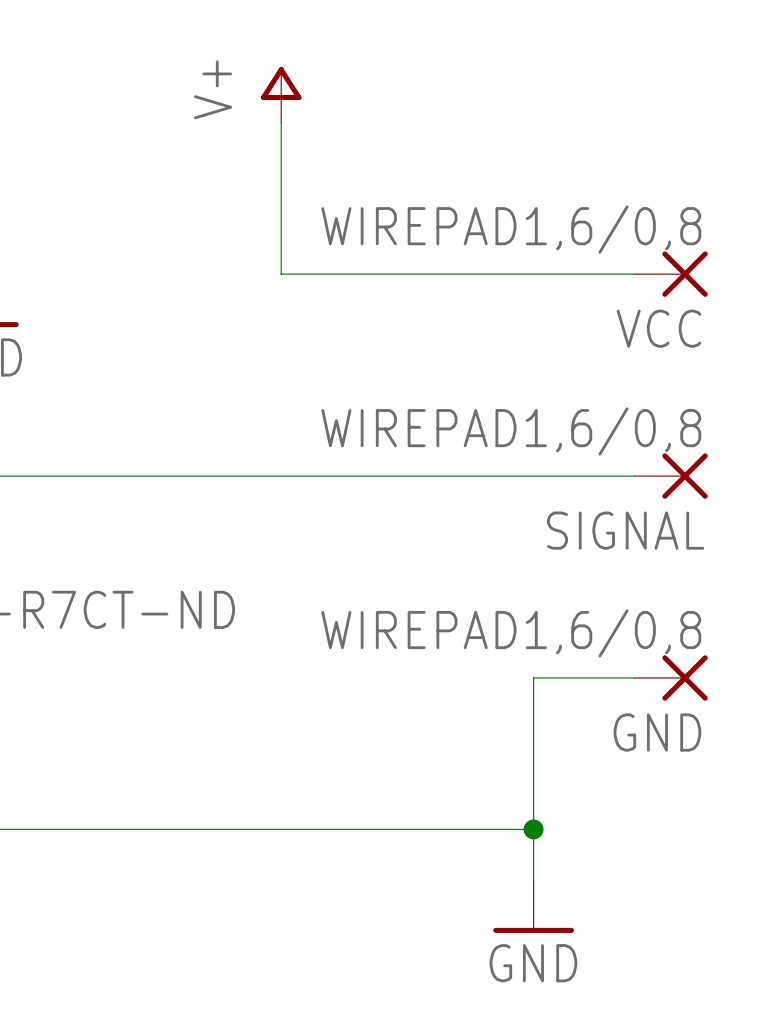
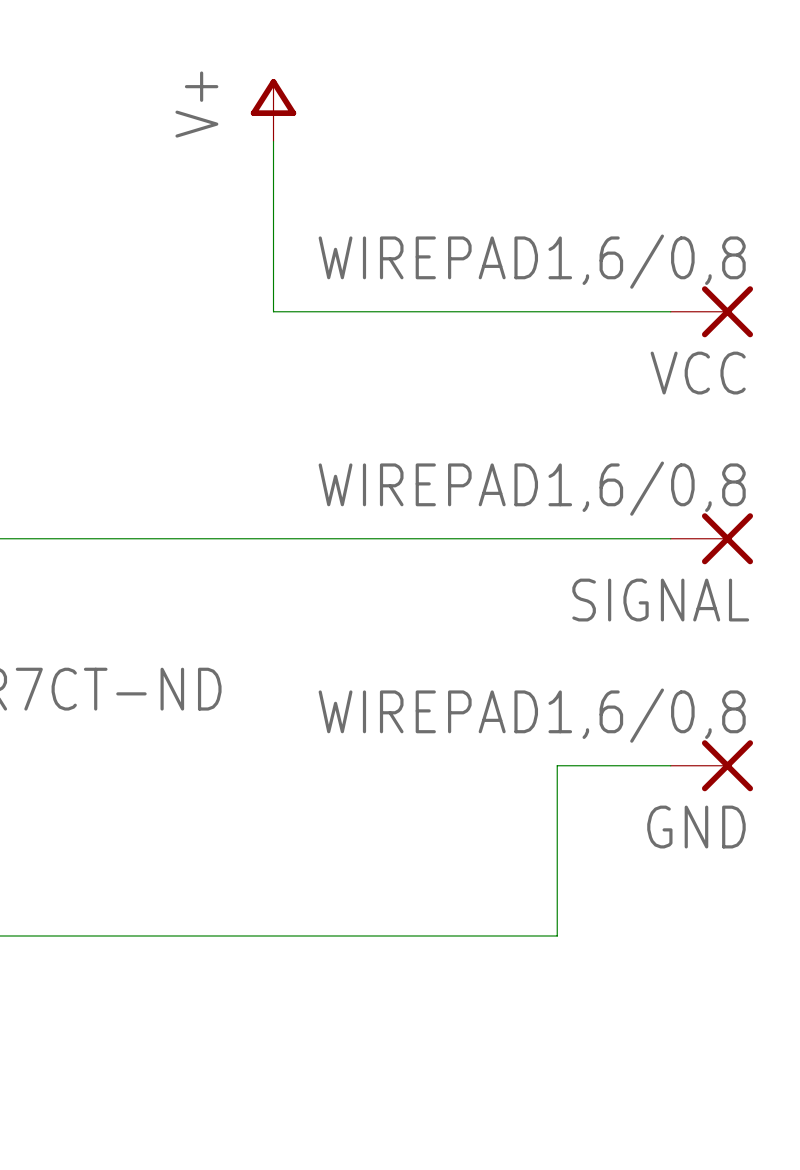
wire: (533, 829) (533, 879) -> none
junction: (533, 829) -> none
power symbol: GND (533, 906) -> none

